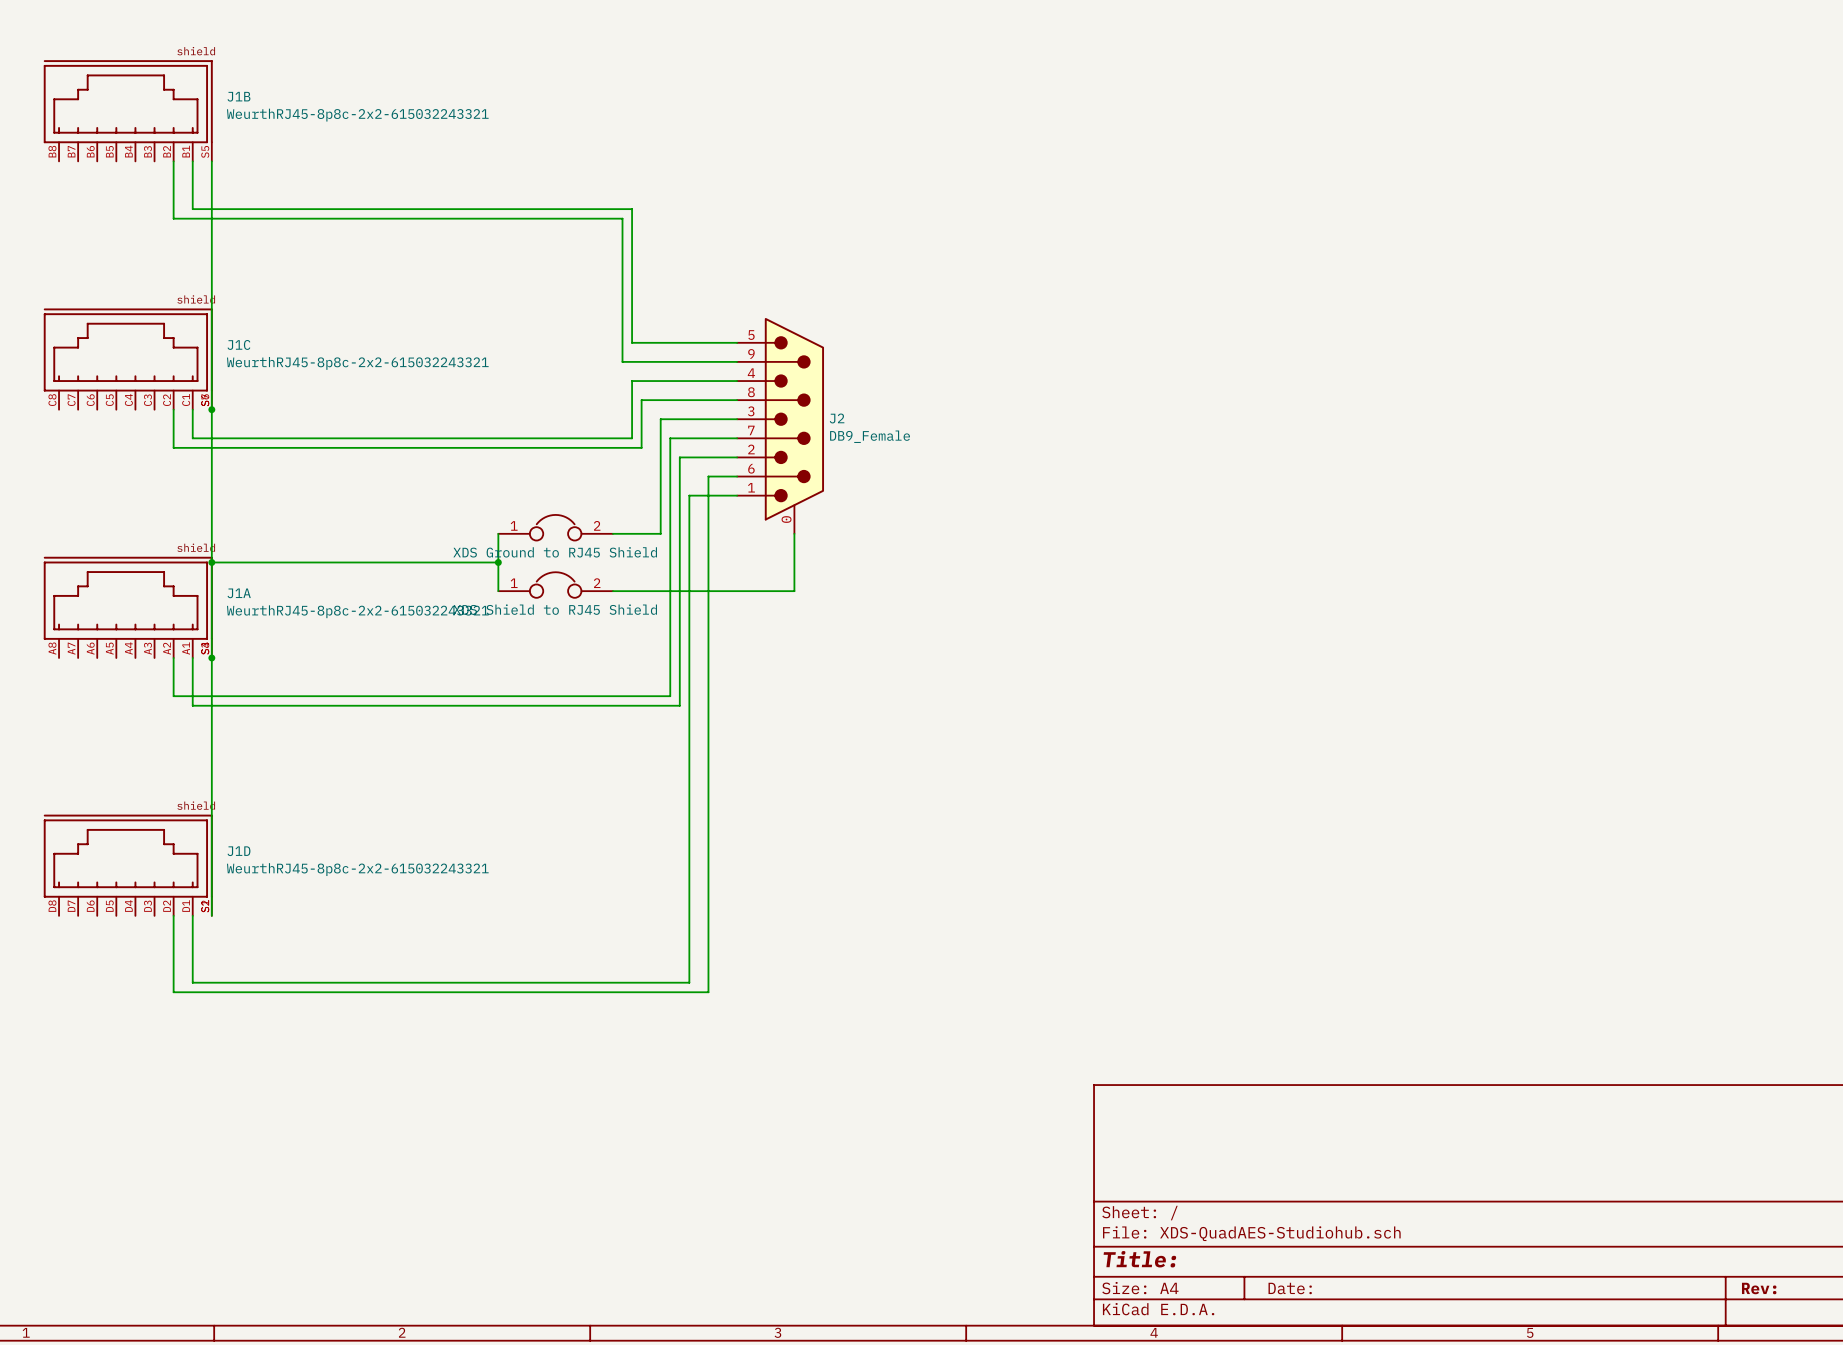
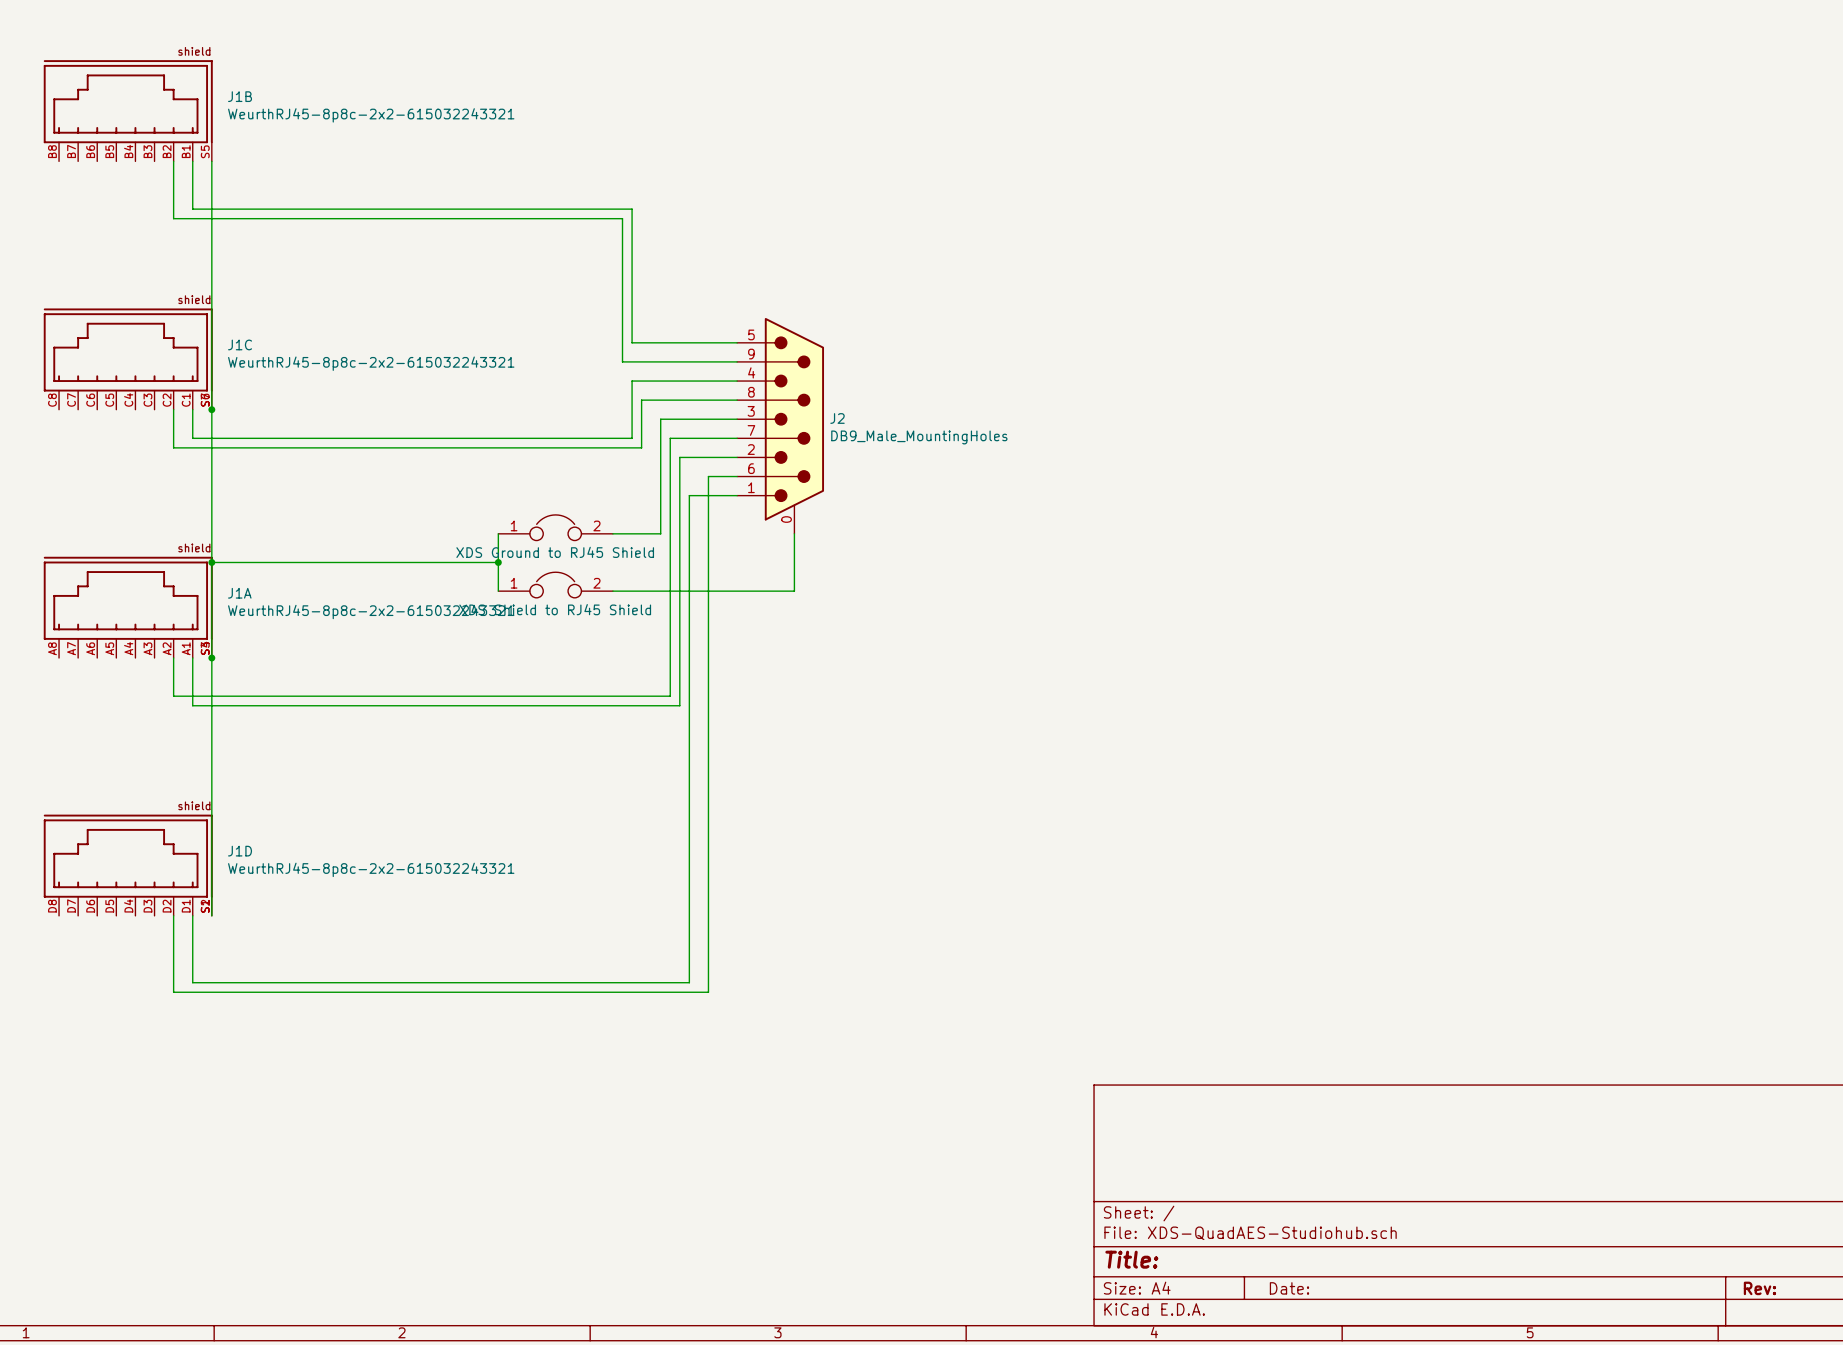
J2 value: DB9_Female (870, 436) -> DB9_Male_MountingHoles (919, 437)

